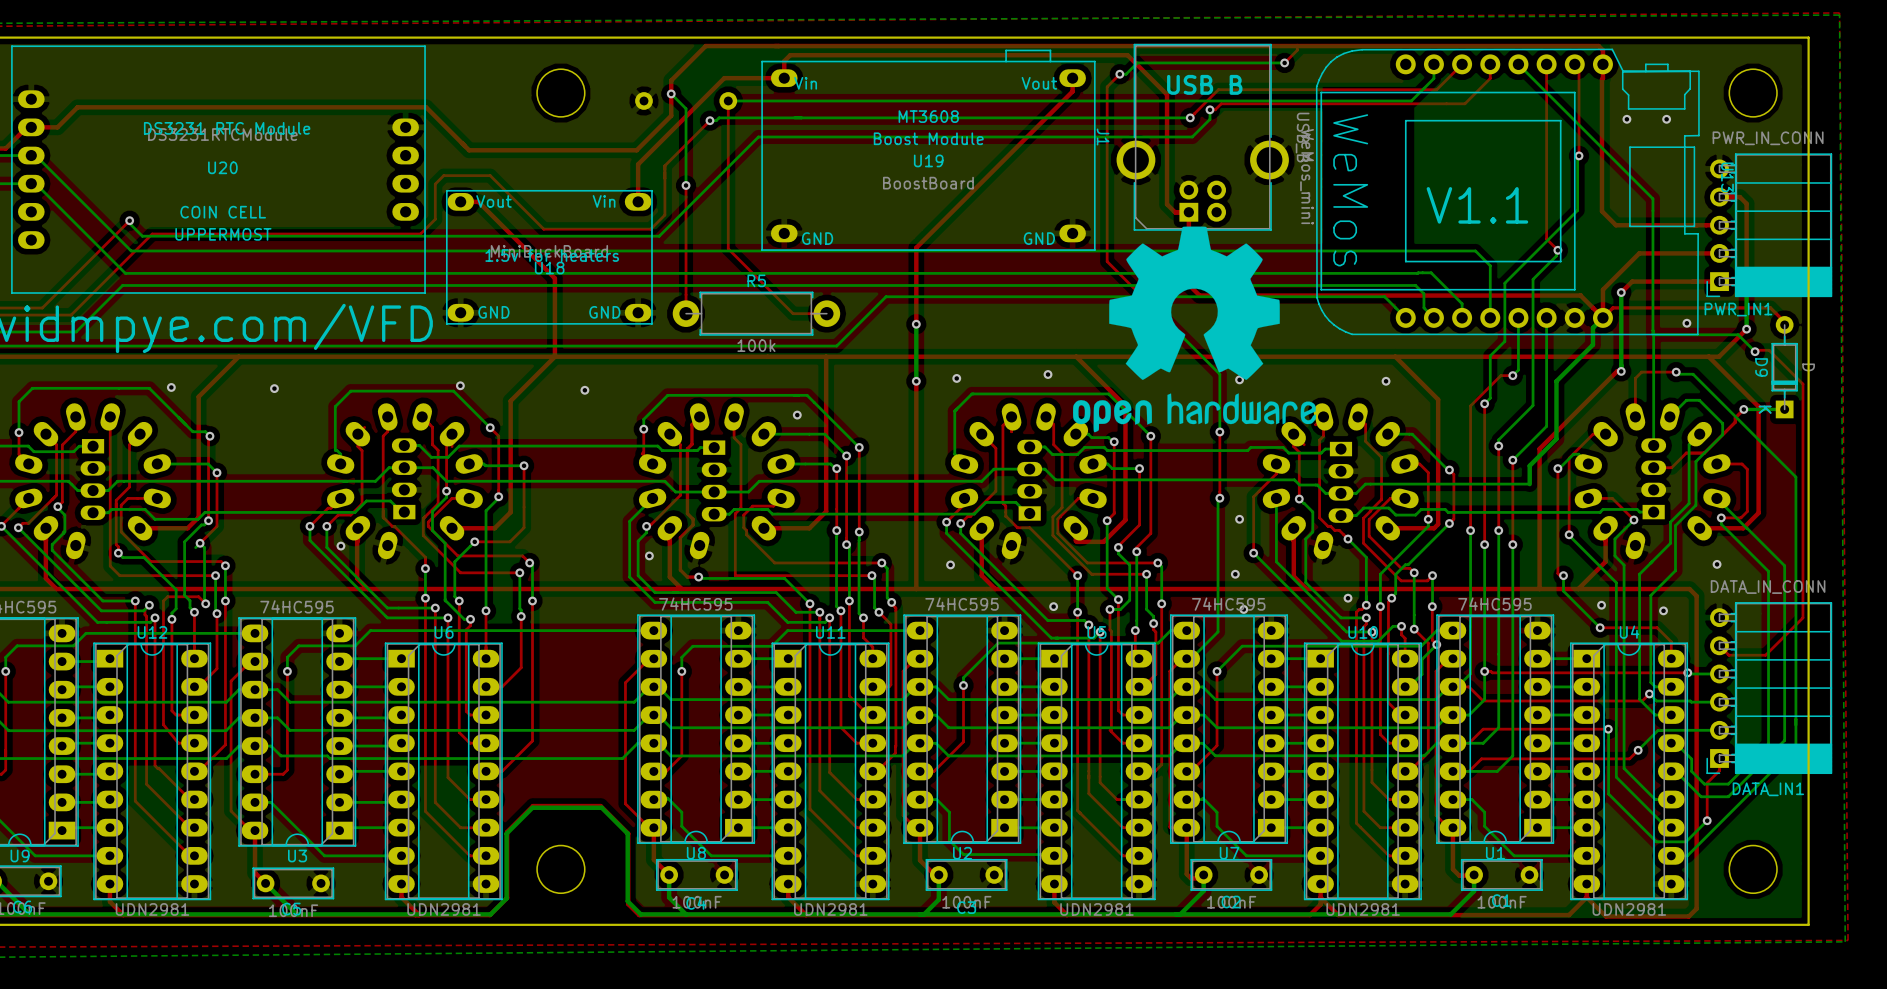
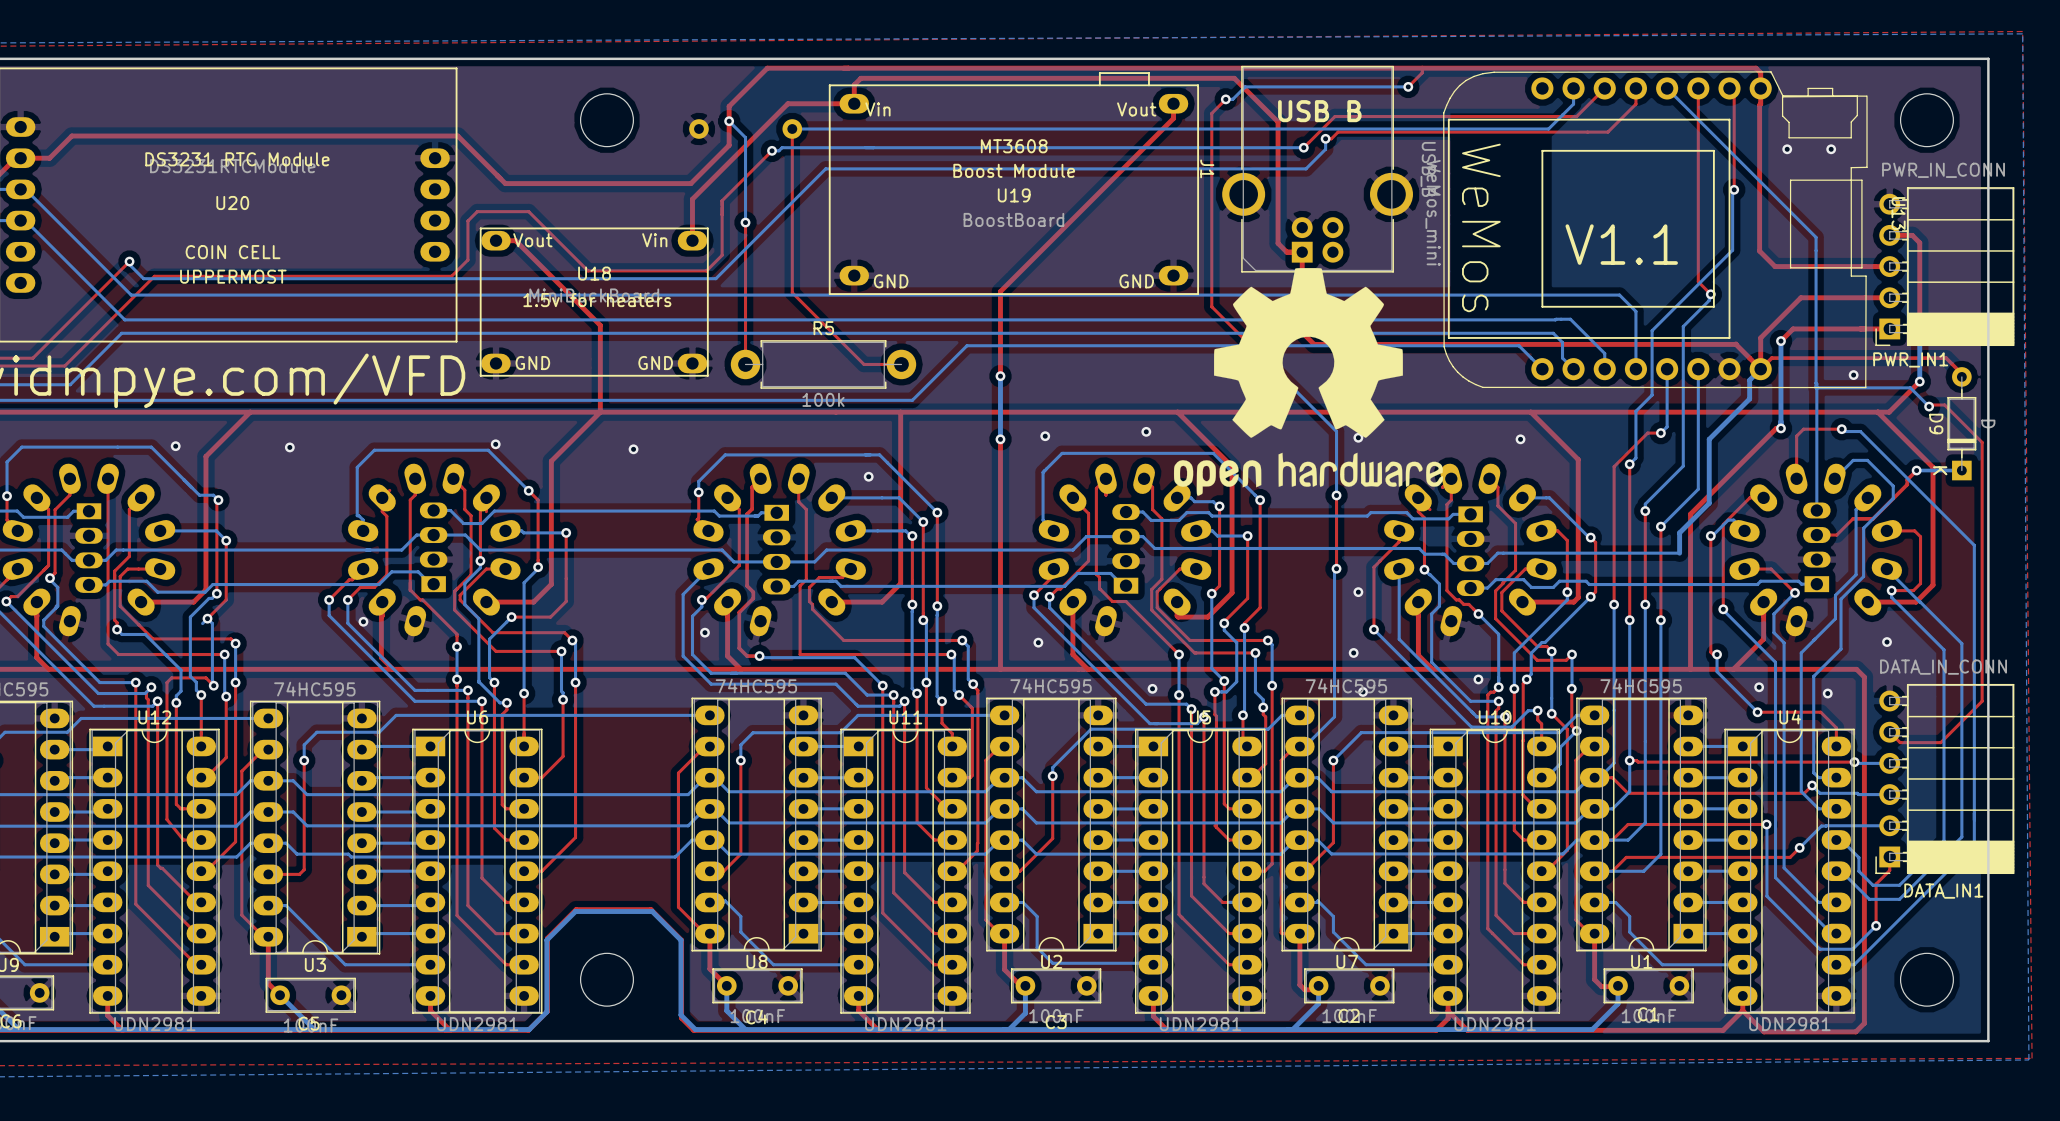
U18 name position: U18 (549, 268) -> U18 (594, 273)

